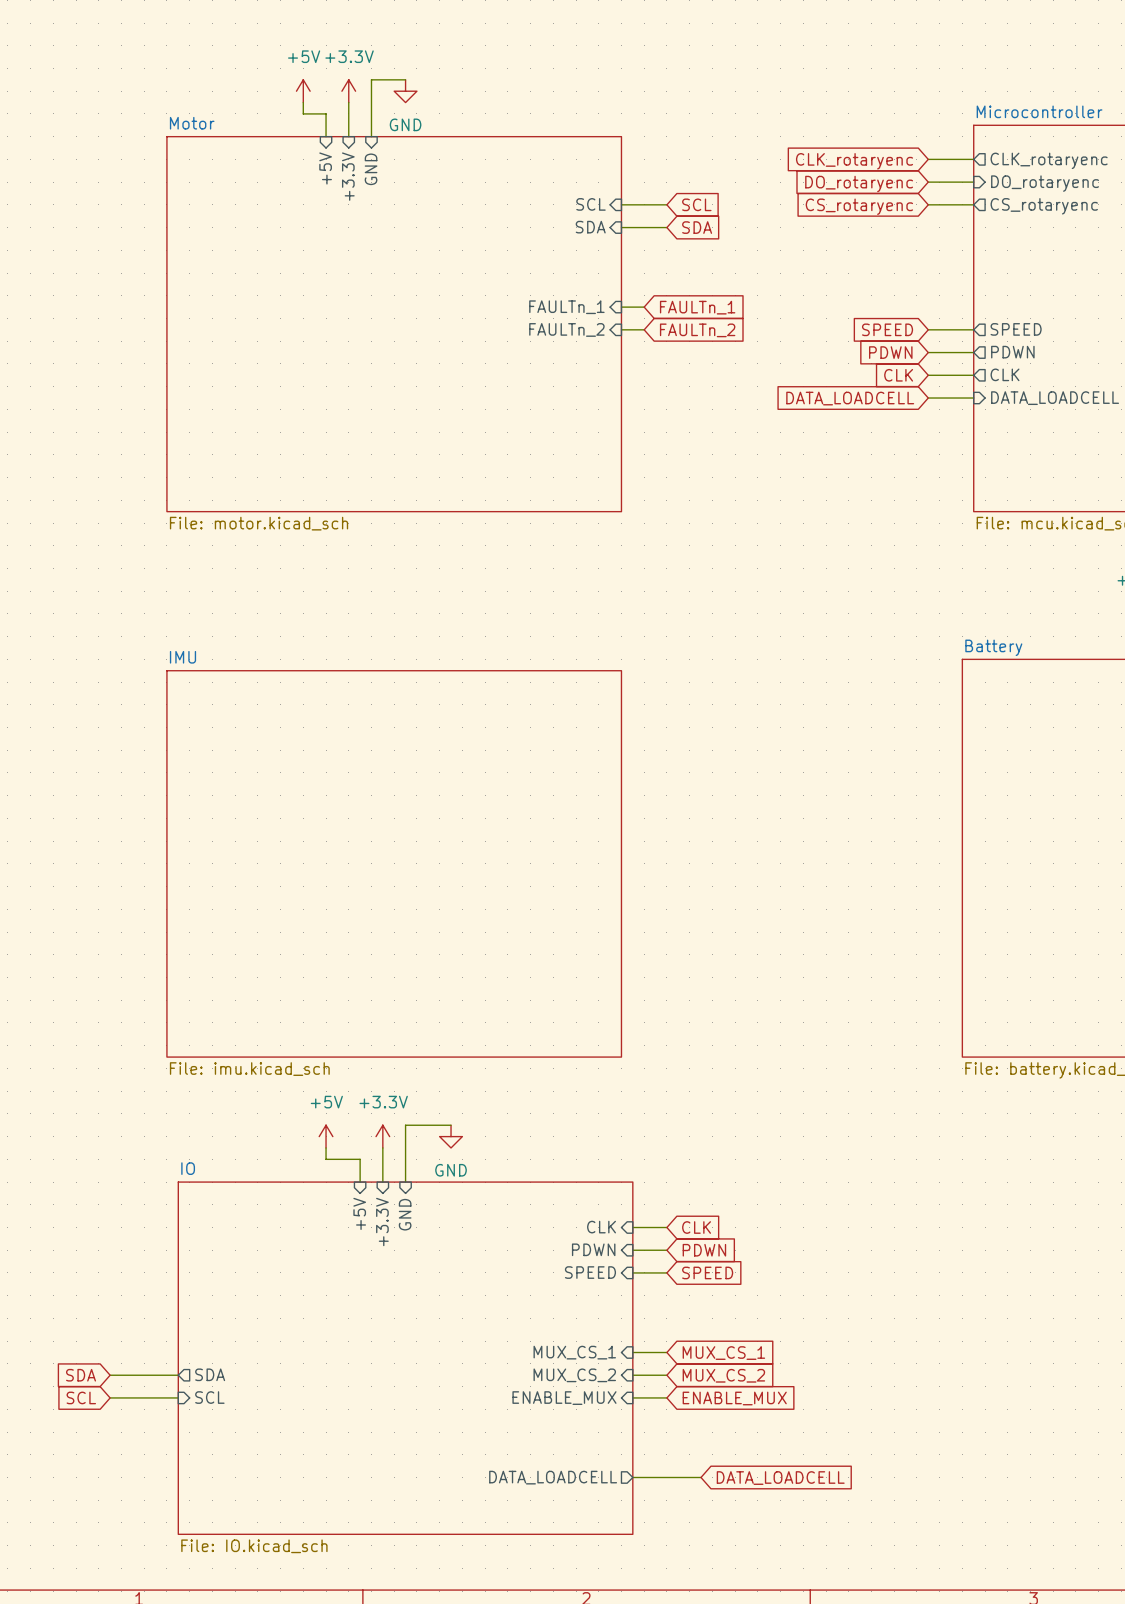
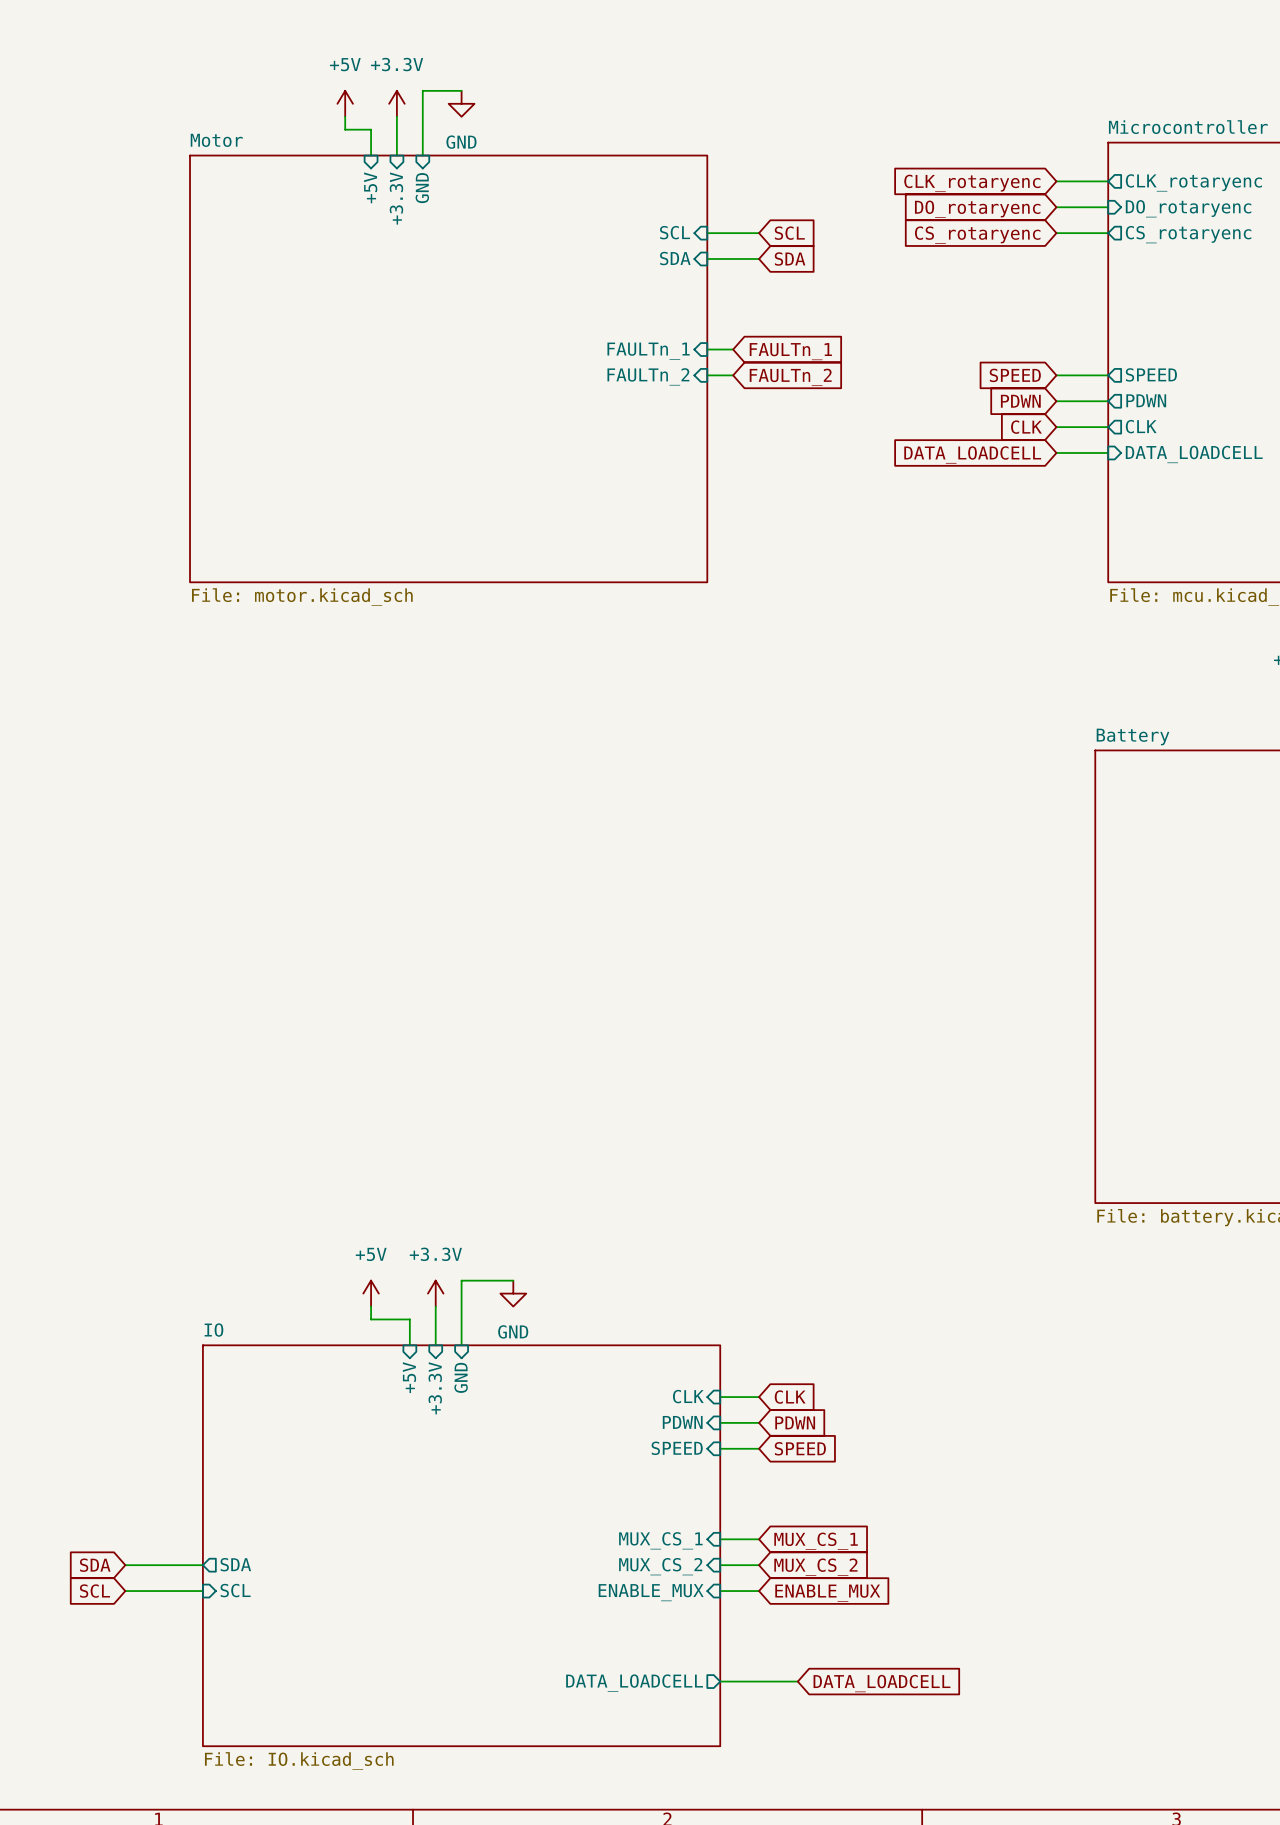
sheet IMU: File: imu.kicad_sch (394, 863) -> none

